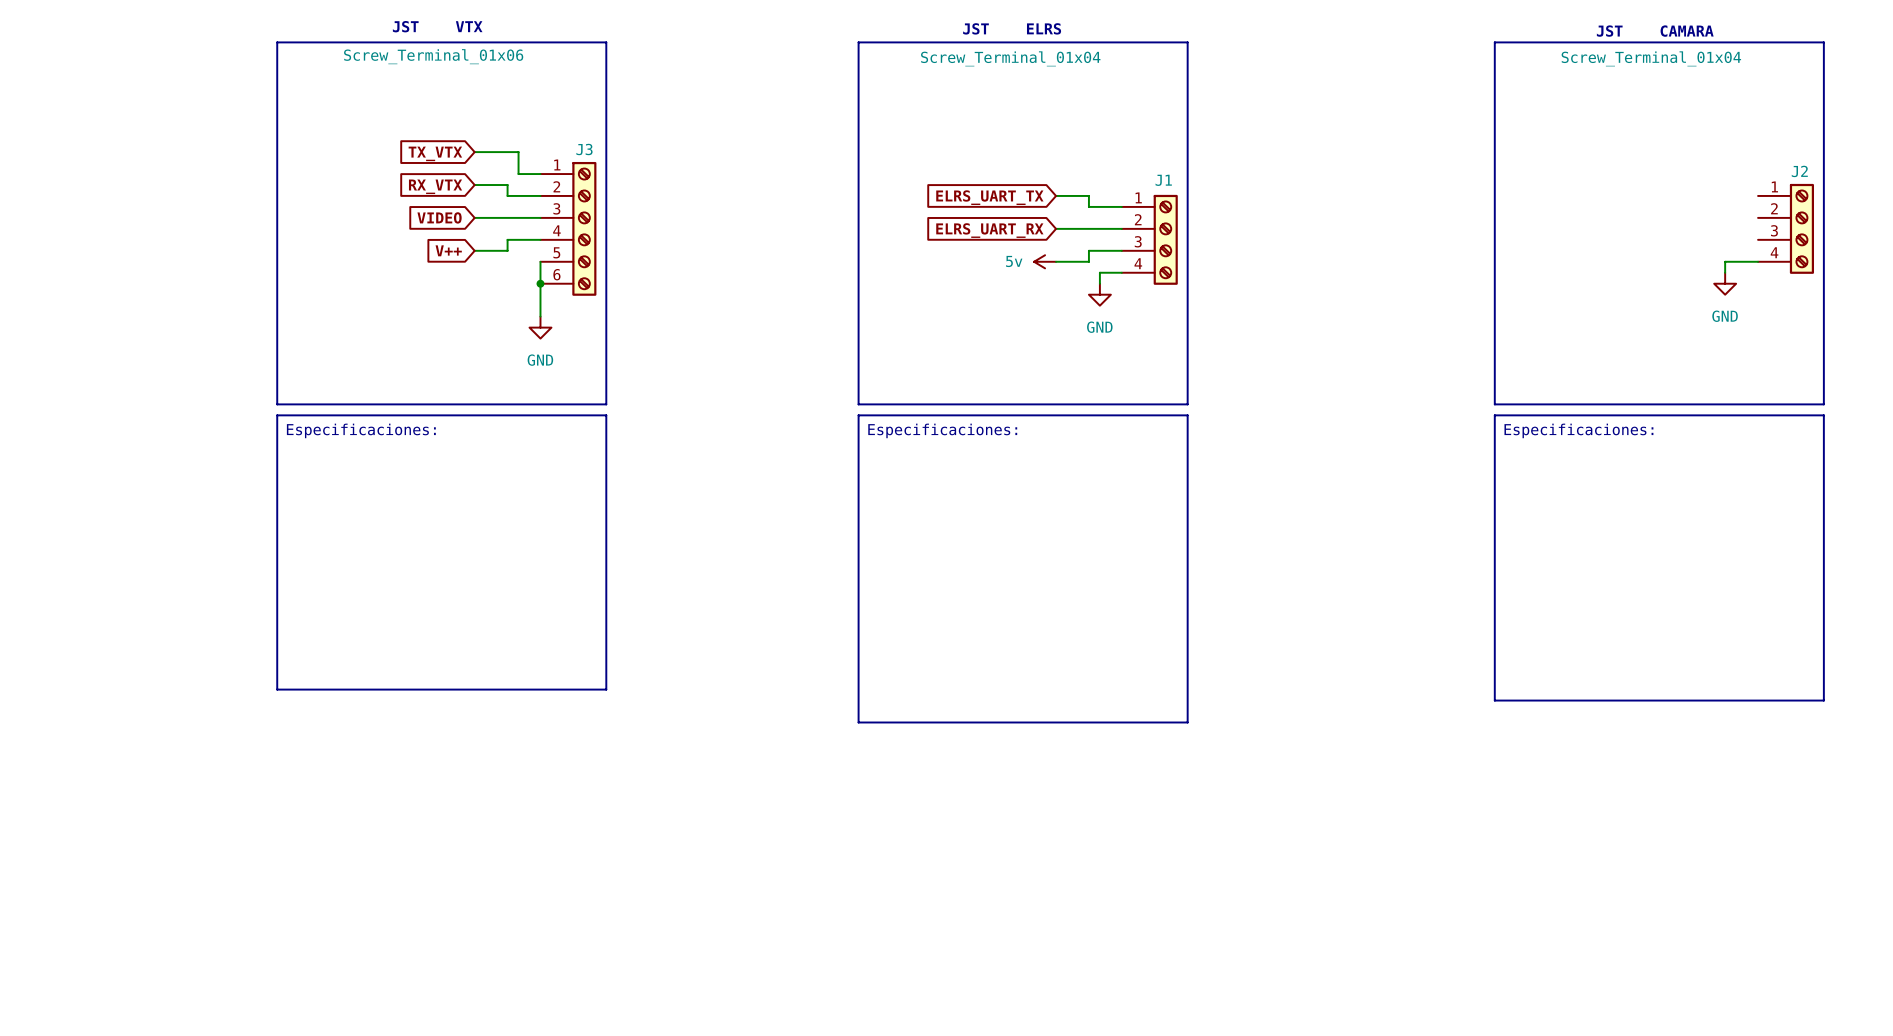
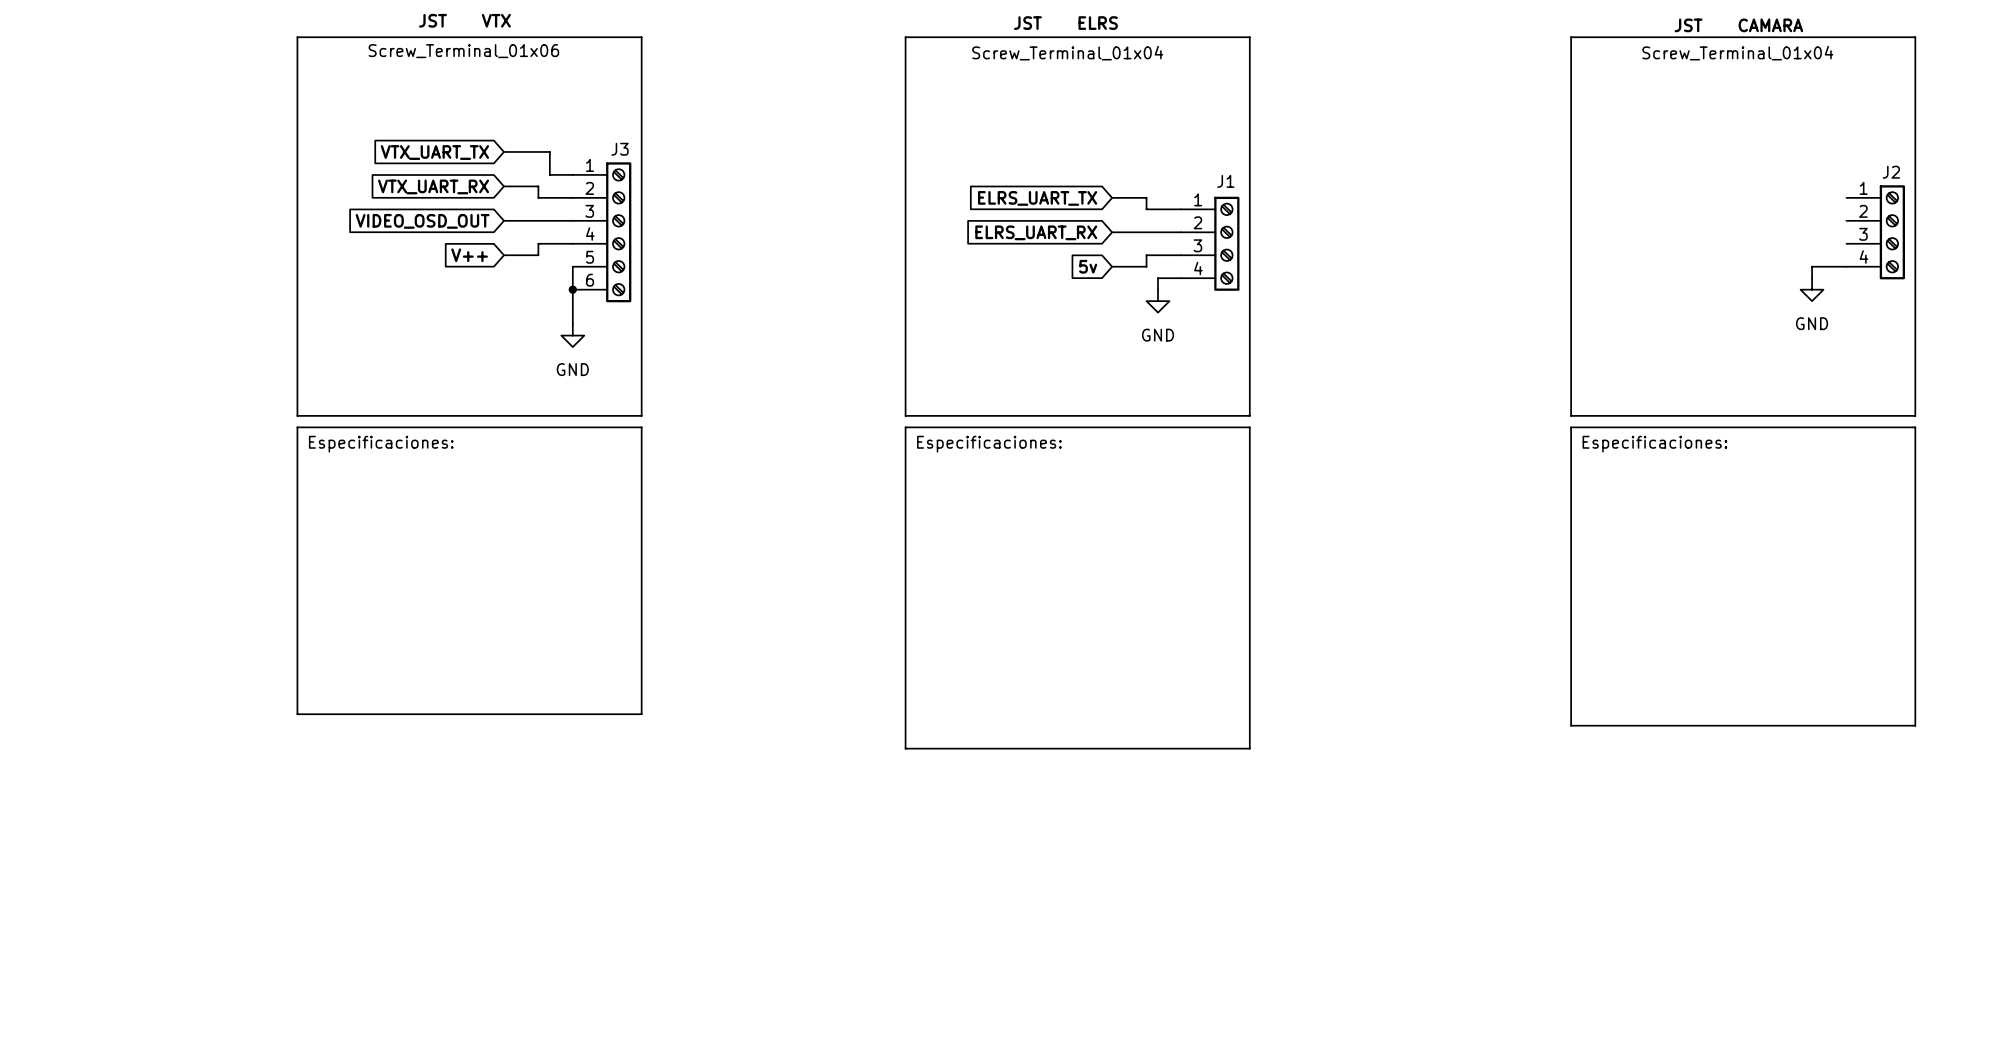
global label: TX_VTX (435, 153) -> VTX_UART_TX (434, 152)
global label: RX_VTX (435, 186) -> VTX_UART_RX (433, 186)
global label: VIDEO (439, 217) -> VIDEO_OSD_OUT (422, 221)
global label: none -> 5v (1088, 266)
power symbol: 5v (1045, 261) -> none

